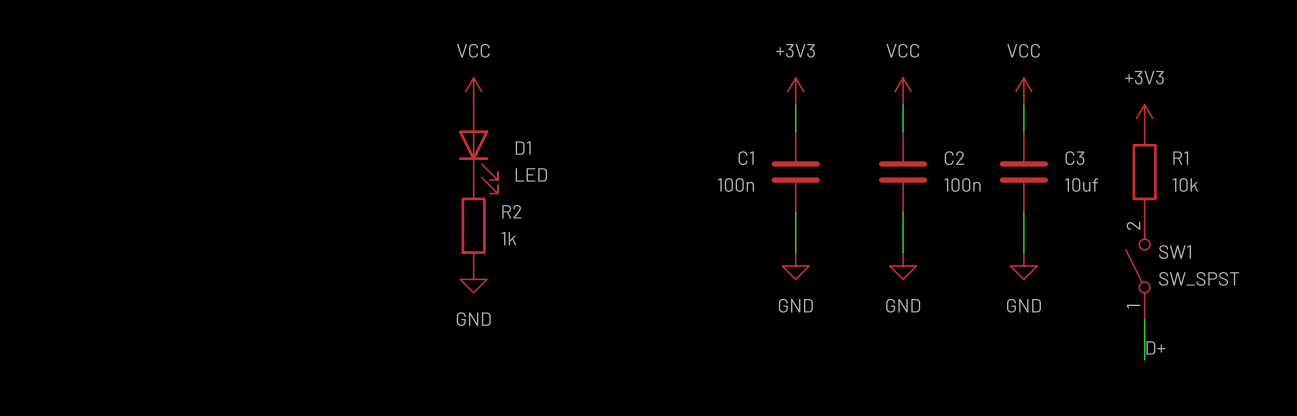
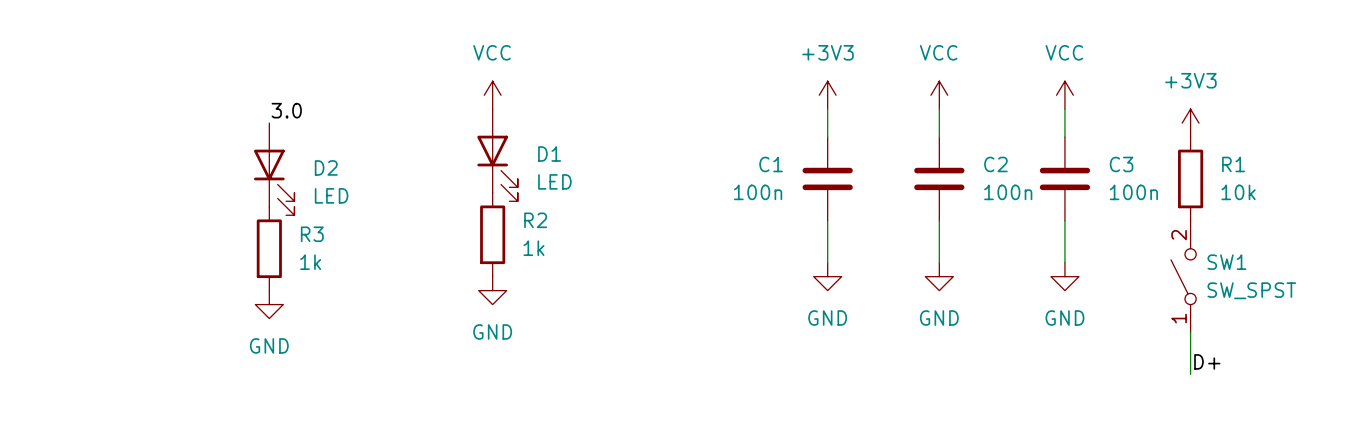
label: none -> 3.0 (286, 110)
D2: none -> LED (274, 169)
C3 value: 10uf (1081, 184) -> 100n (1133, 192)
R3: none -> 1k (269, 248)
power symbol: none -> GND (269, 304)

